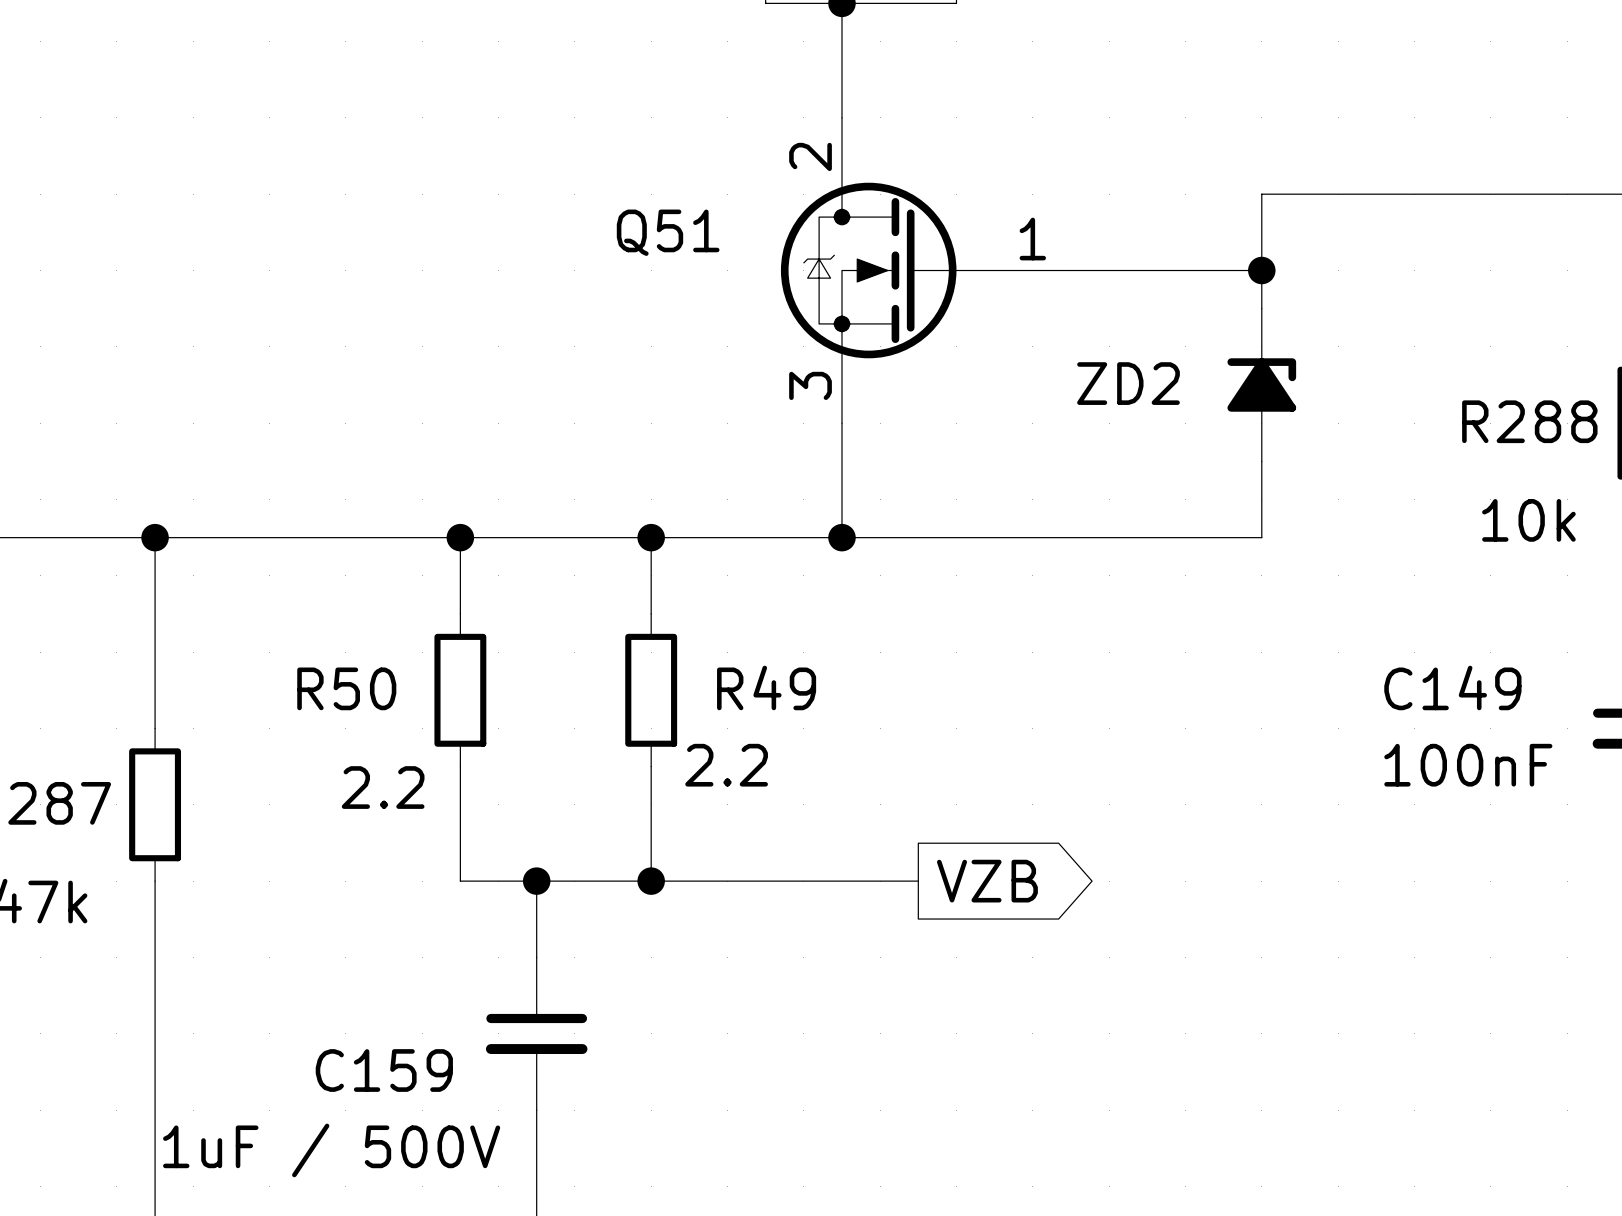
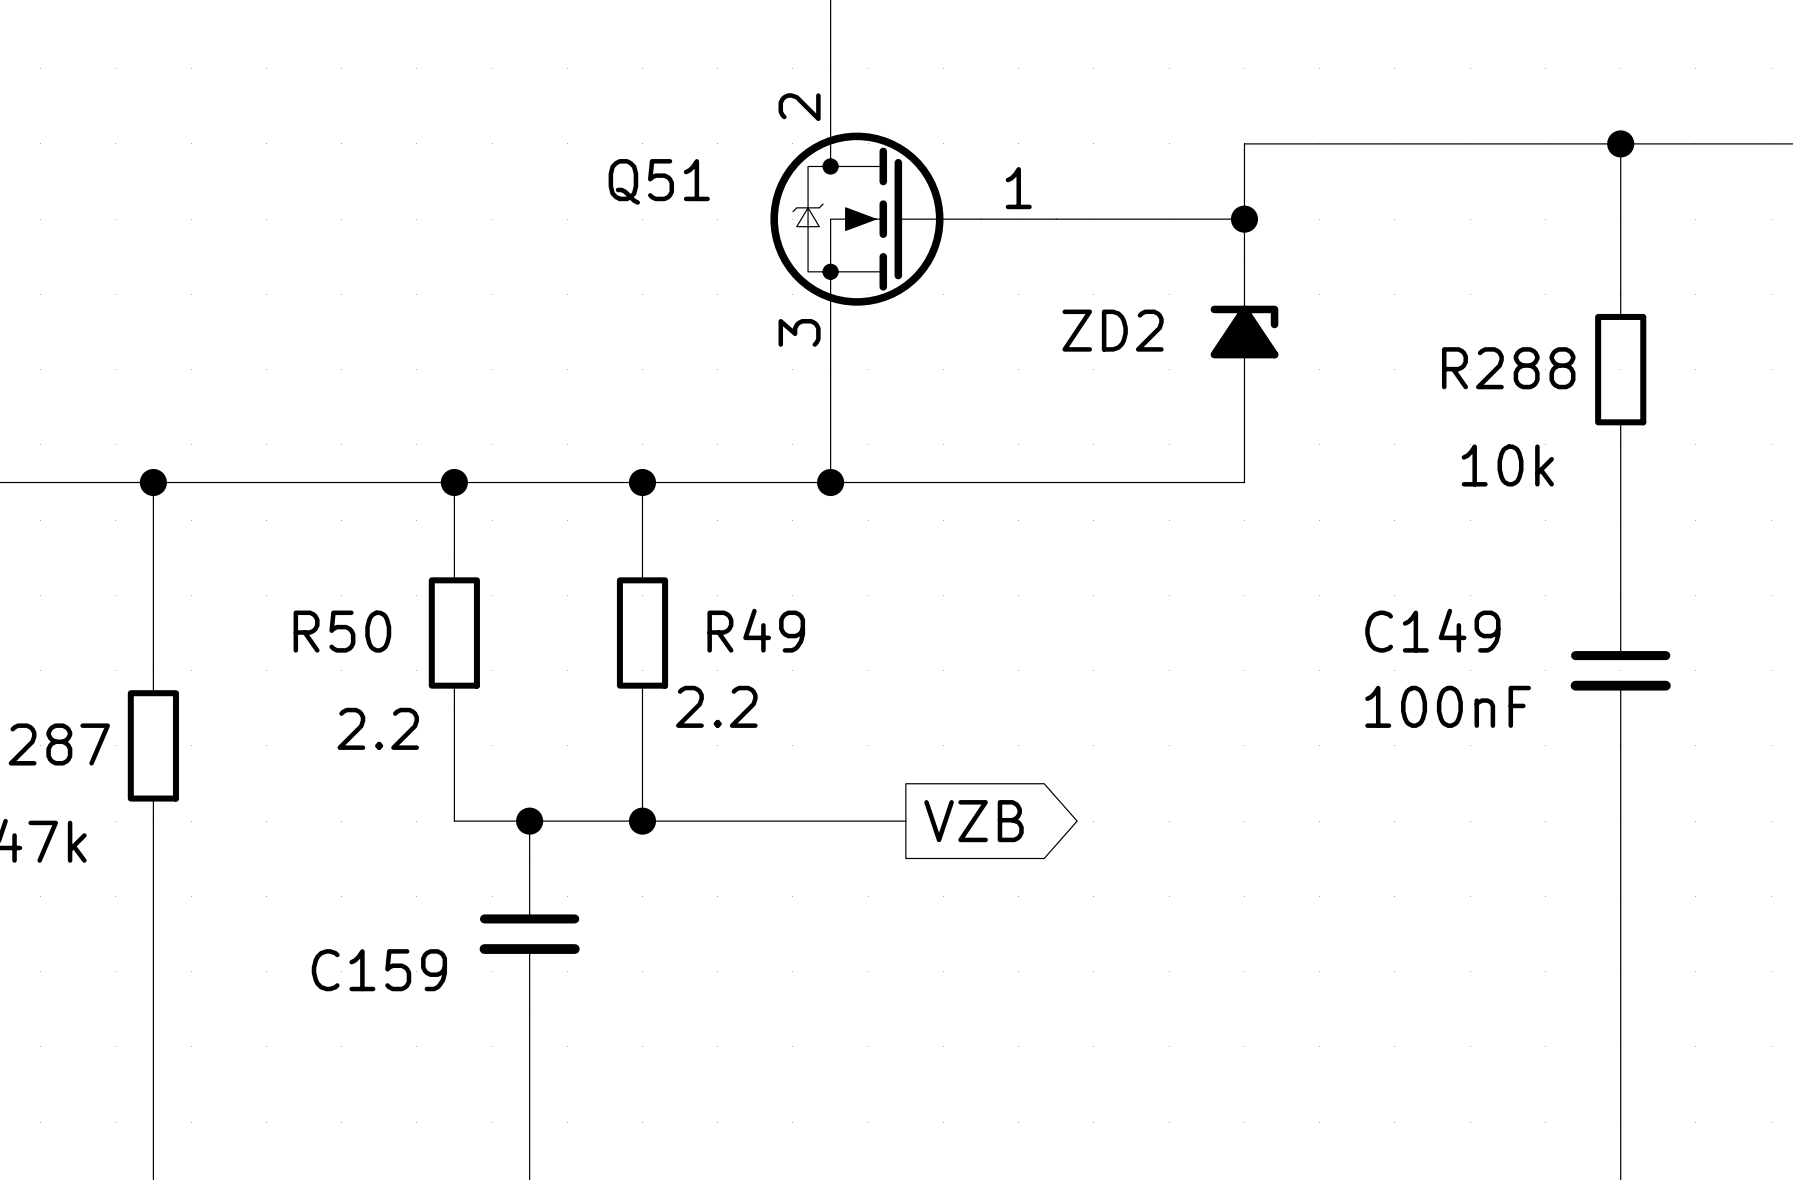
C159 position: (536, 1033) -> (529, 933)
C159 value: 1uF / 500V (331, 1150) -> none

